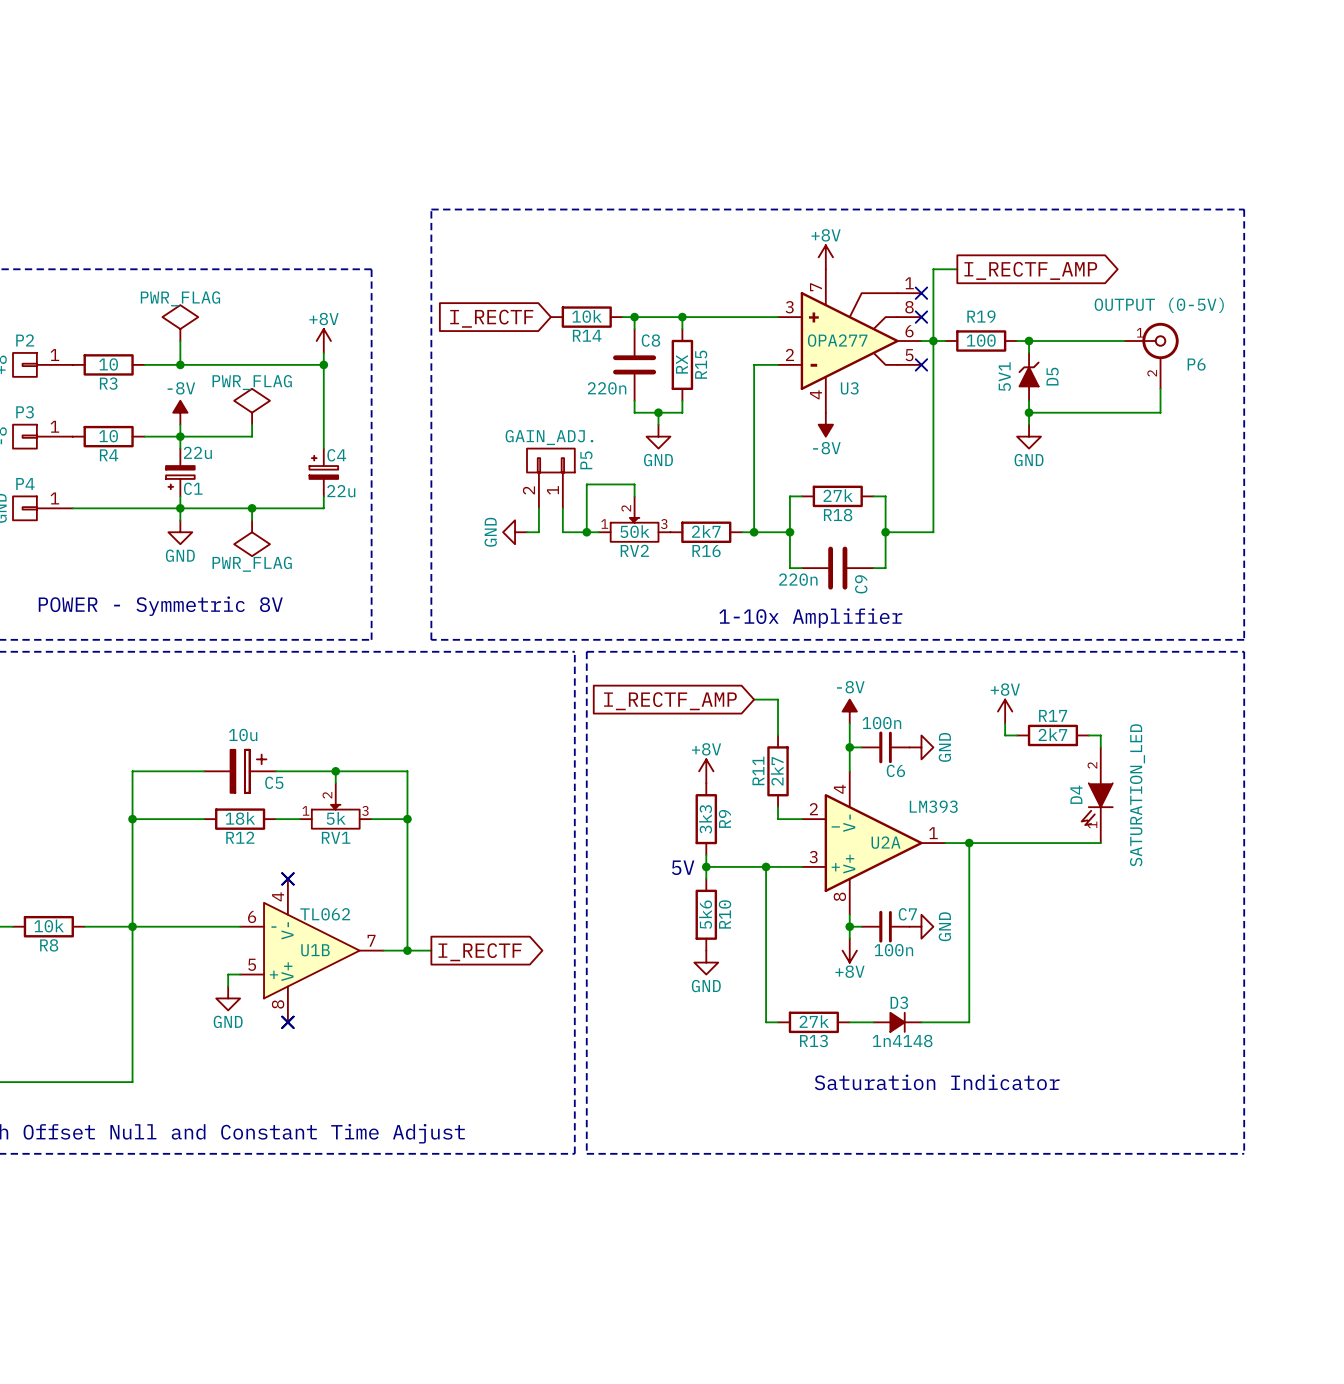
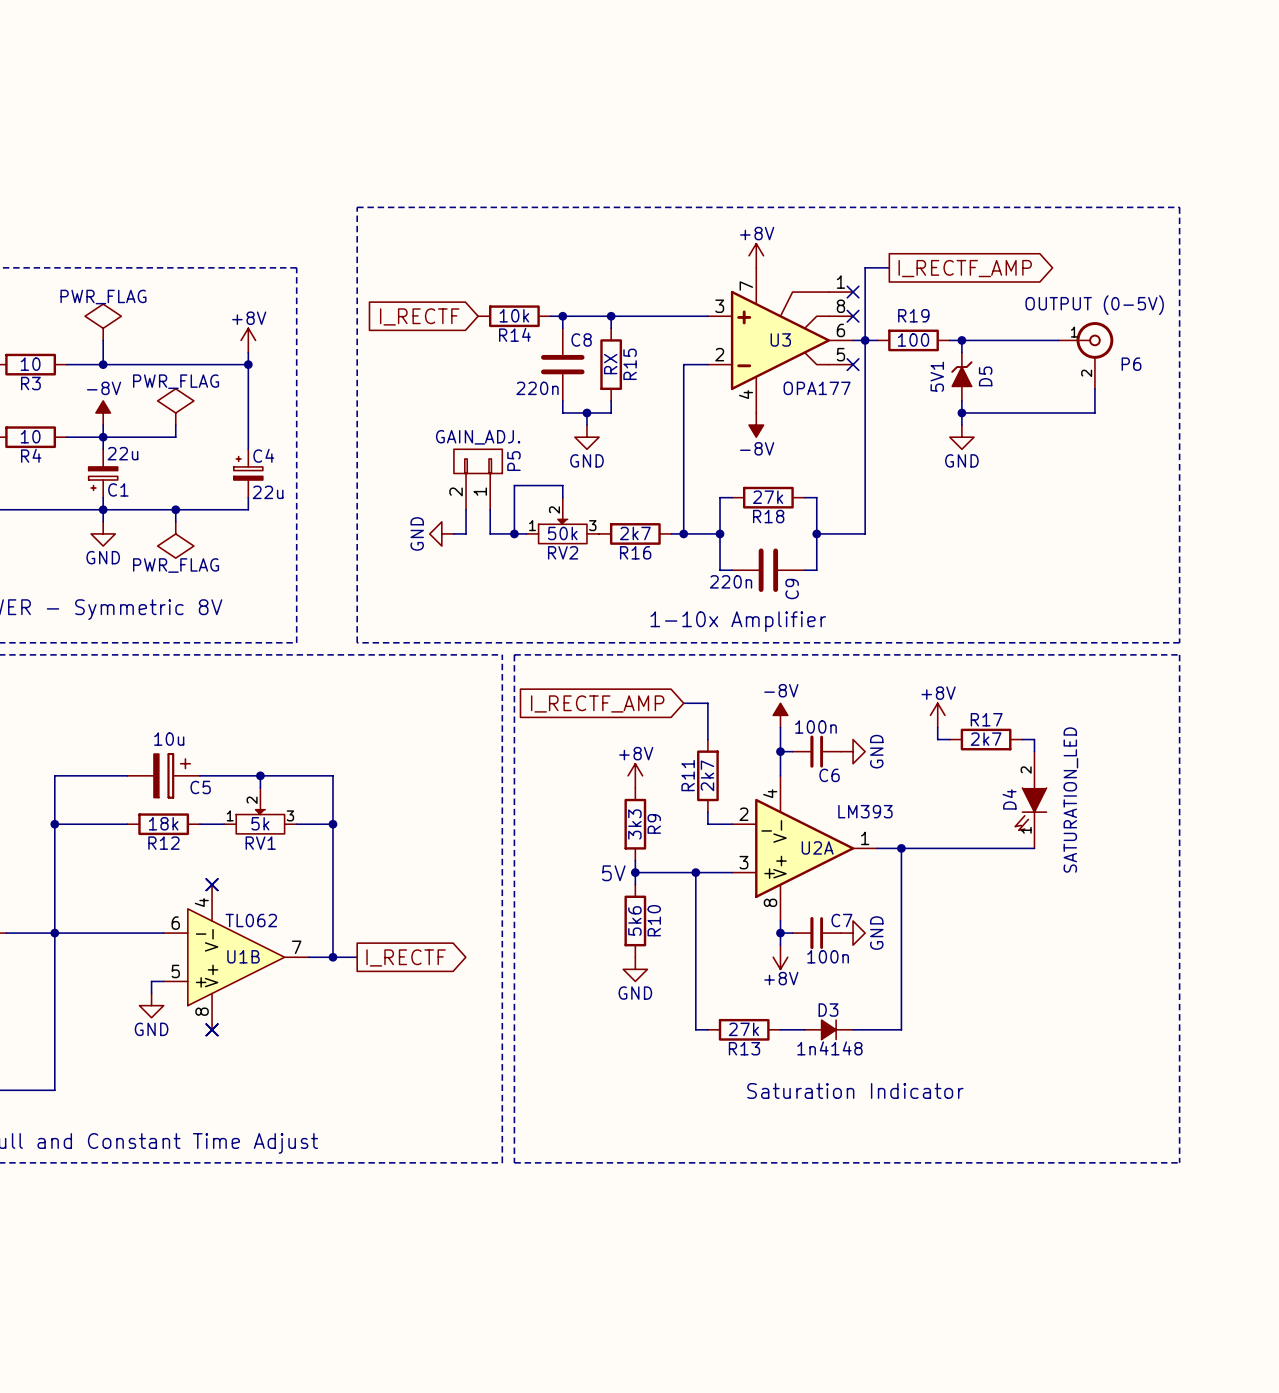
U3 value: OPA277 (837, 340) -> OPA177 (817, 388)
U3 name position: U3 (849, 388) -> U3 (780, 339)

